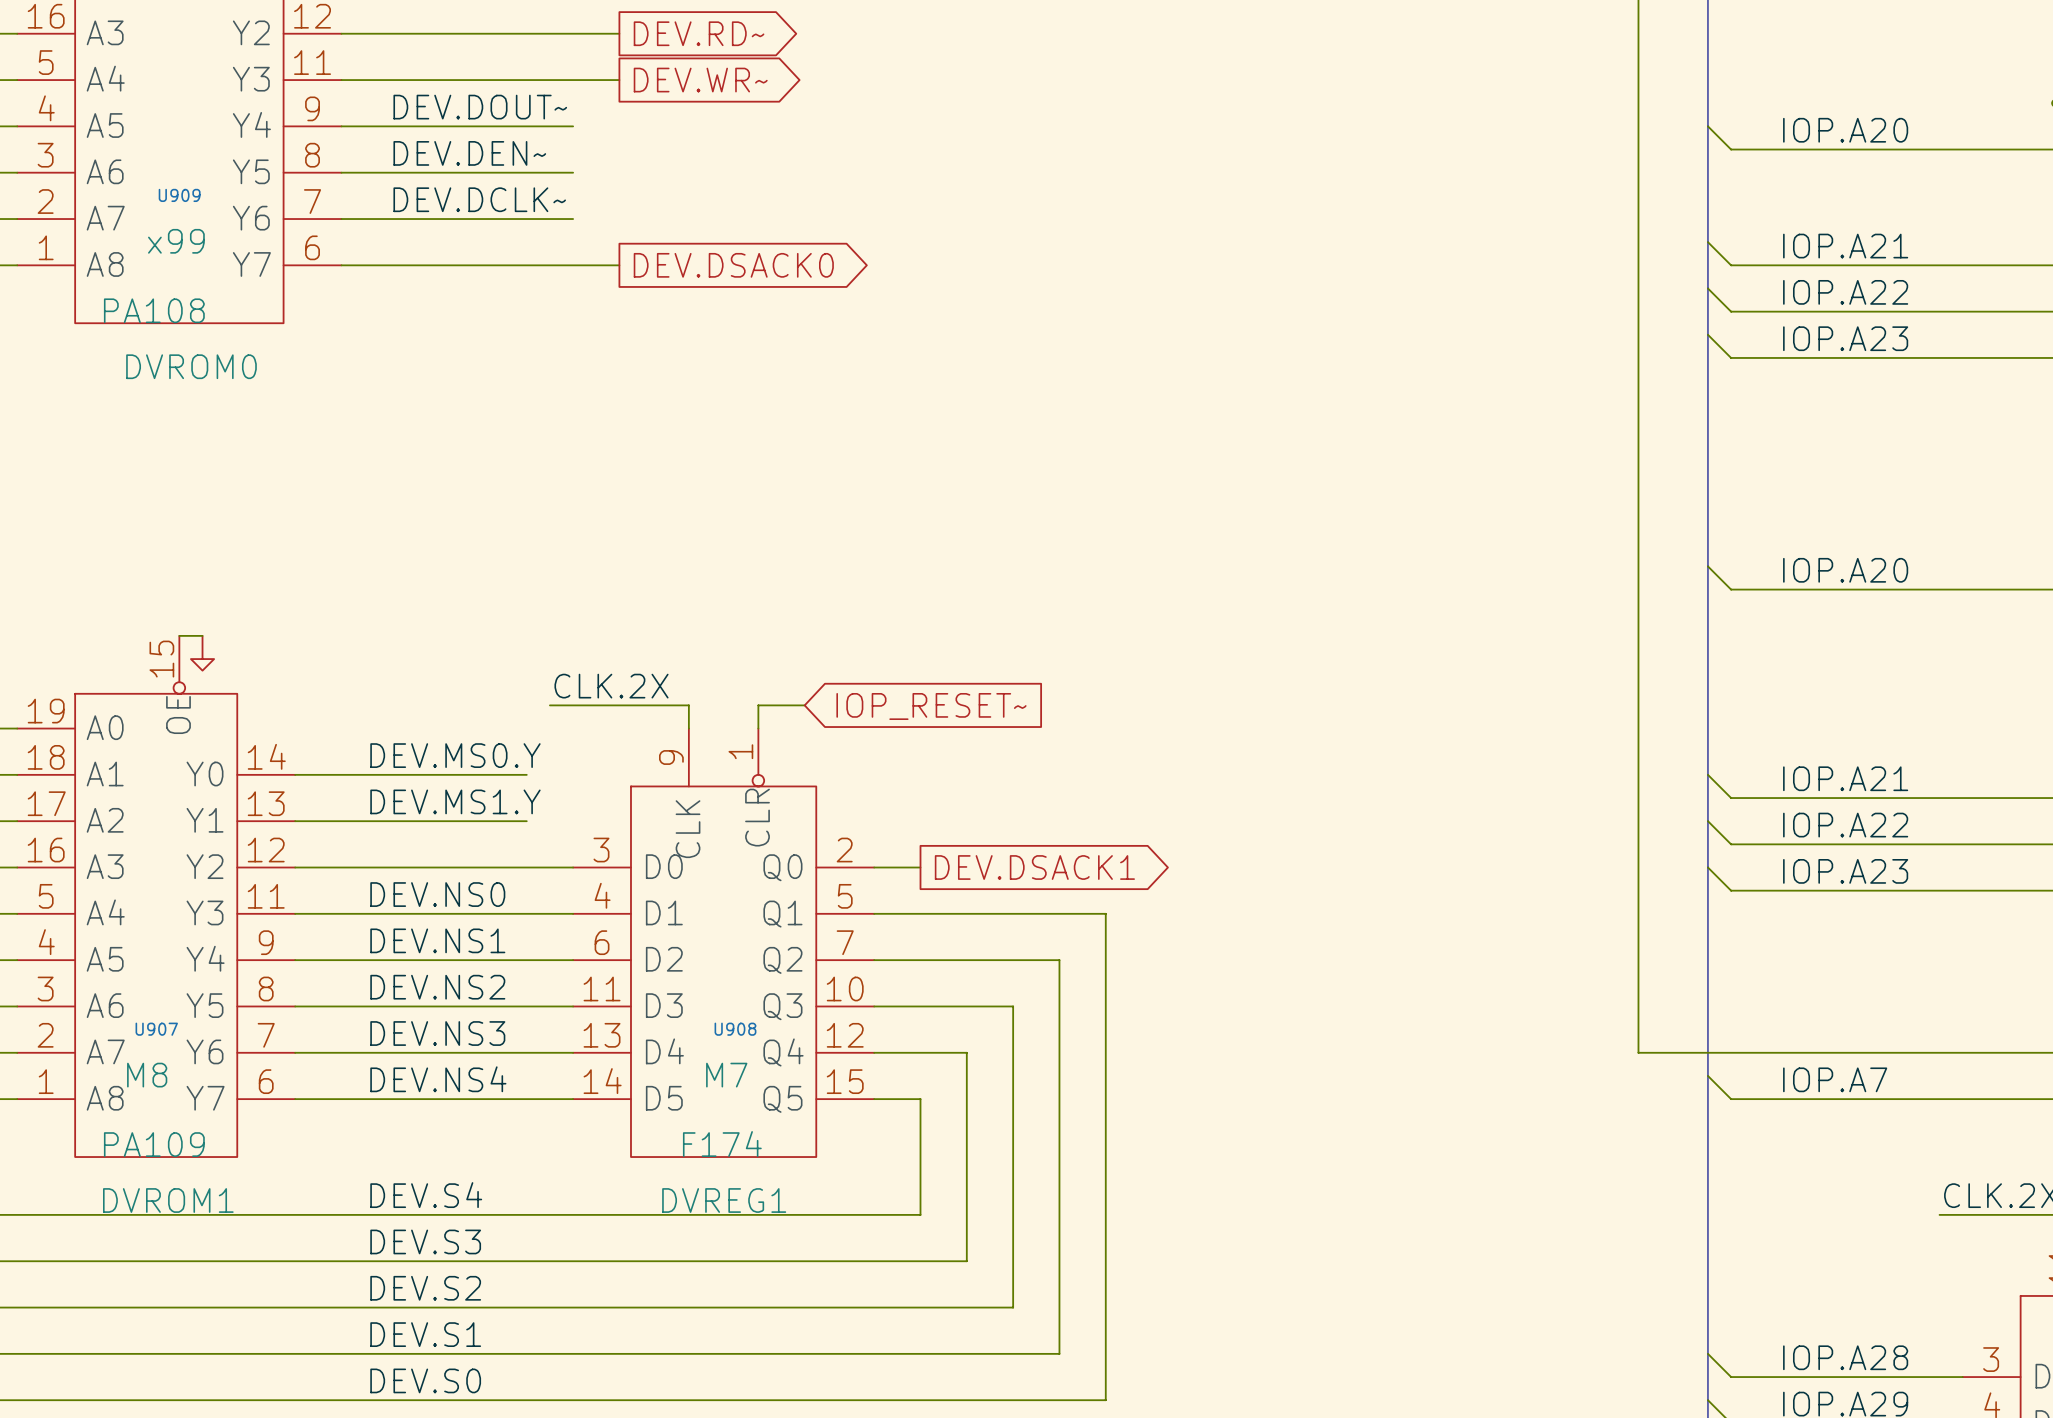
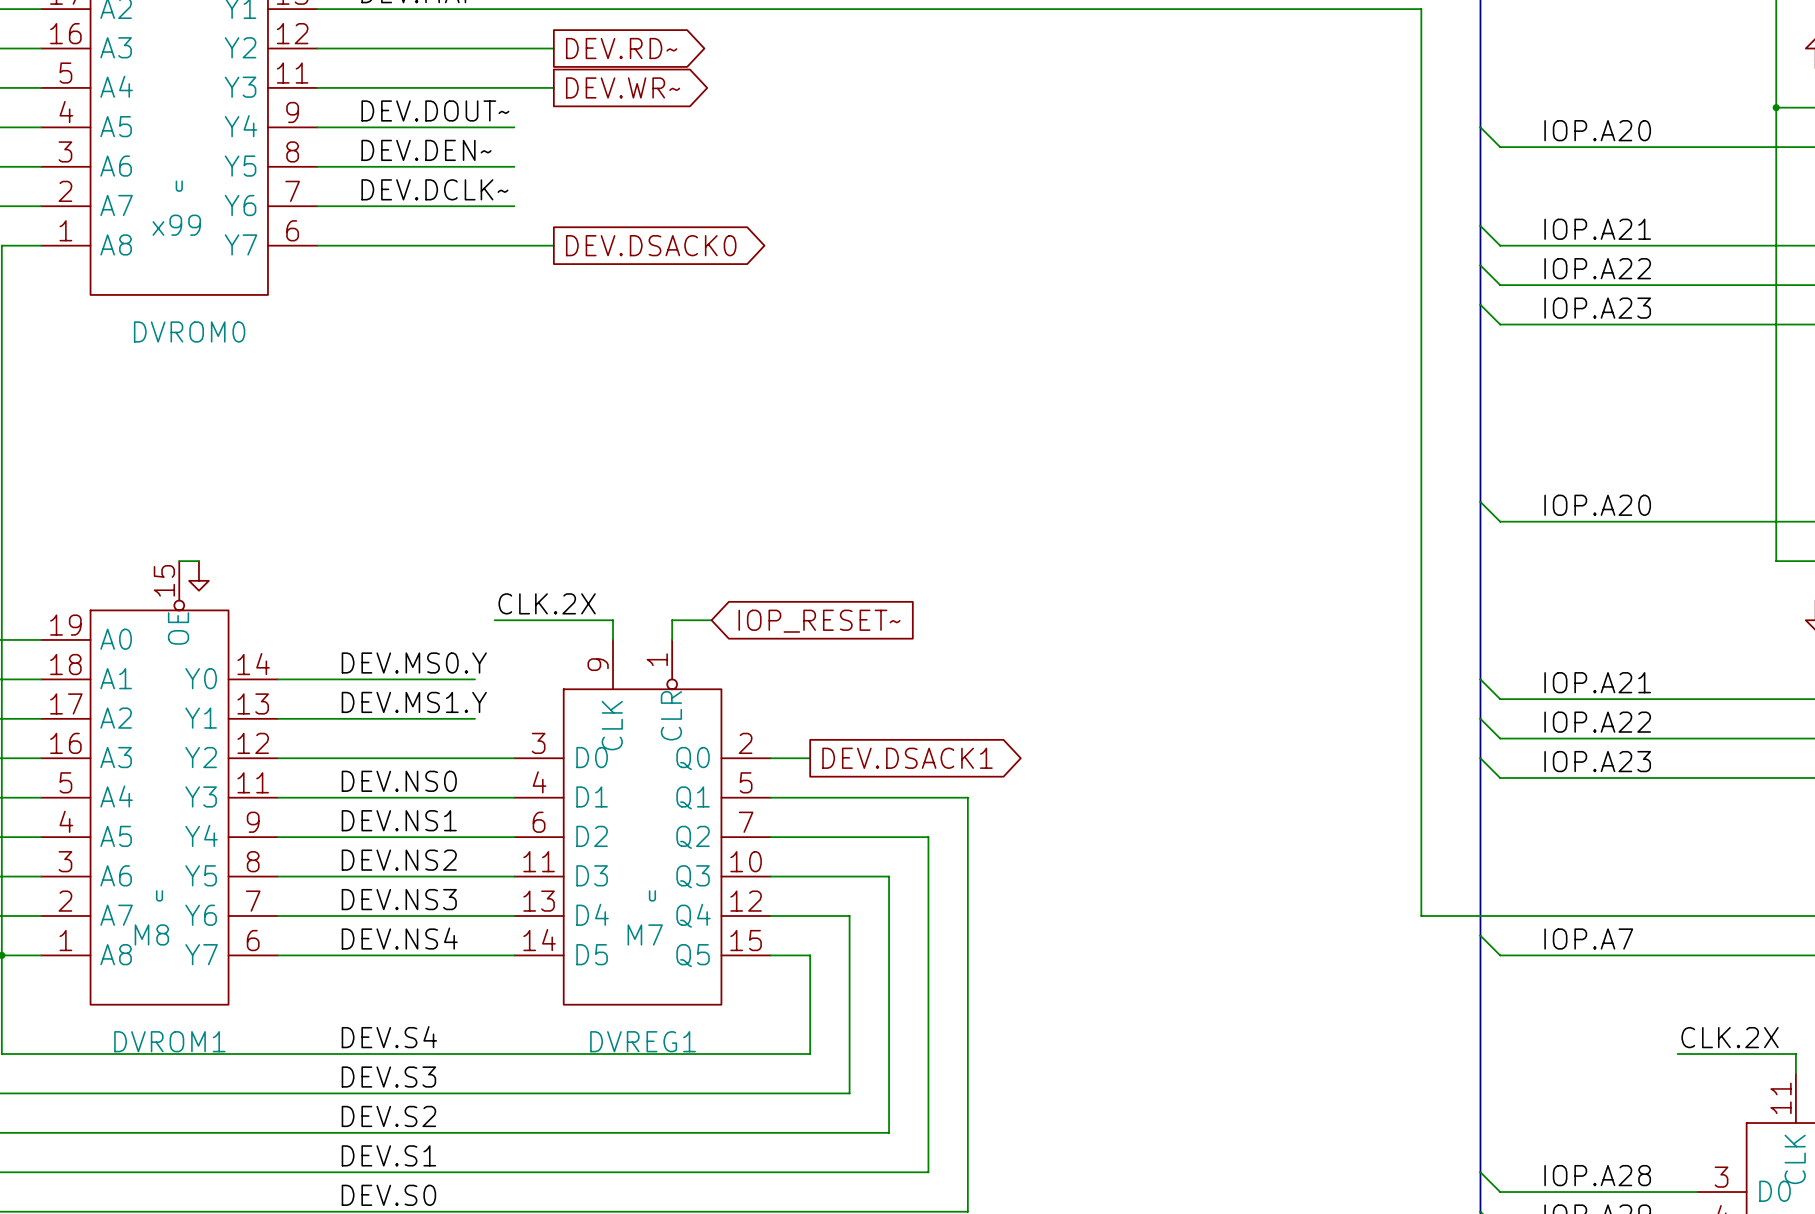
U909 name: U909 (179, 195) -> U (179, 186)
U909 value: PA108 (154, 310) -> none
U907 name: U907 (156, 1029) -> U (159, 895)
U908 name: U908 (735, 1029) -> U (652, 895)
U907 value: PA109 (154, 1144) -> none
U908 value: F174 (722, 1144) -> none

